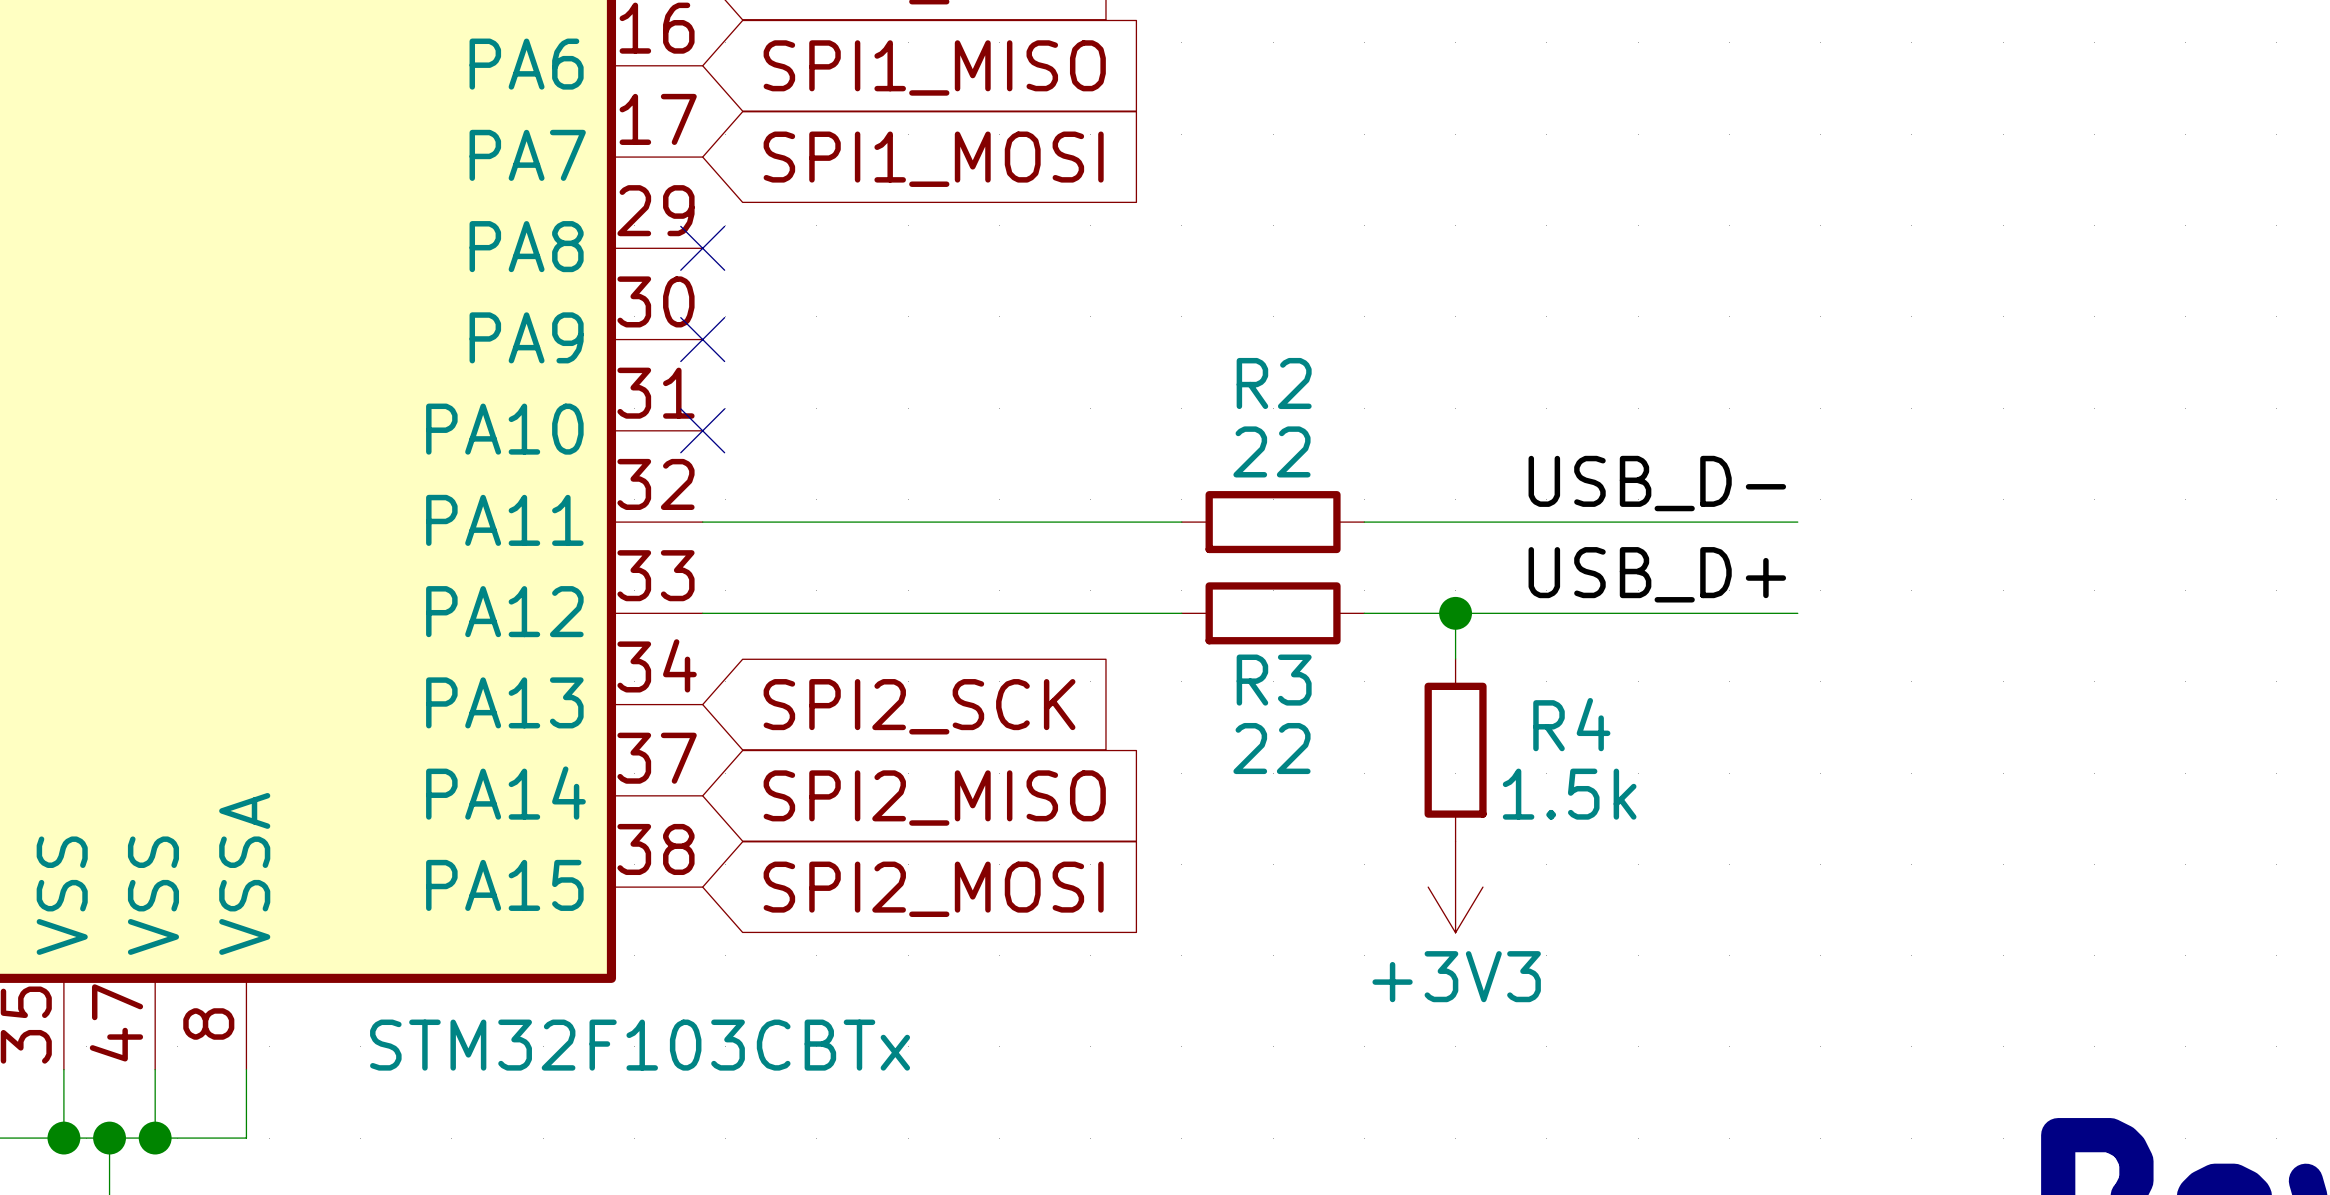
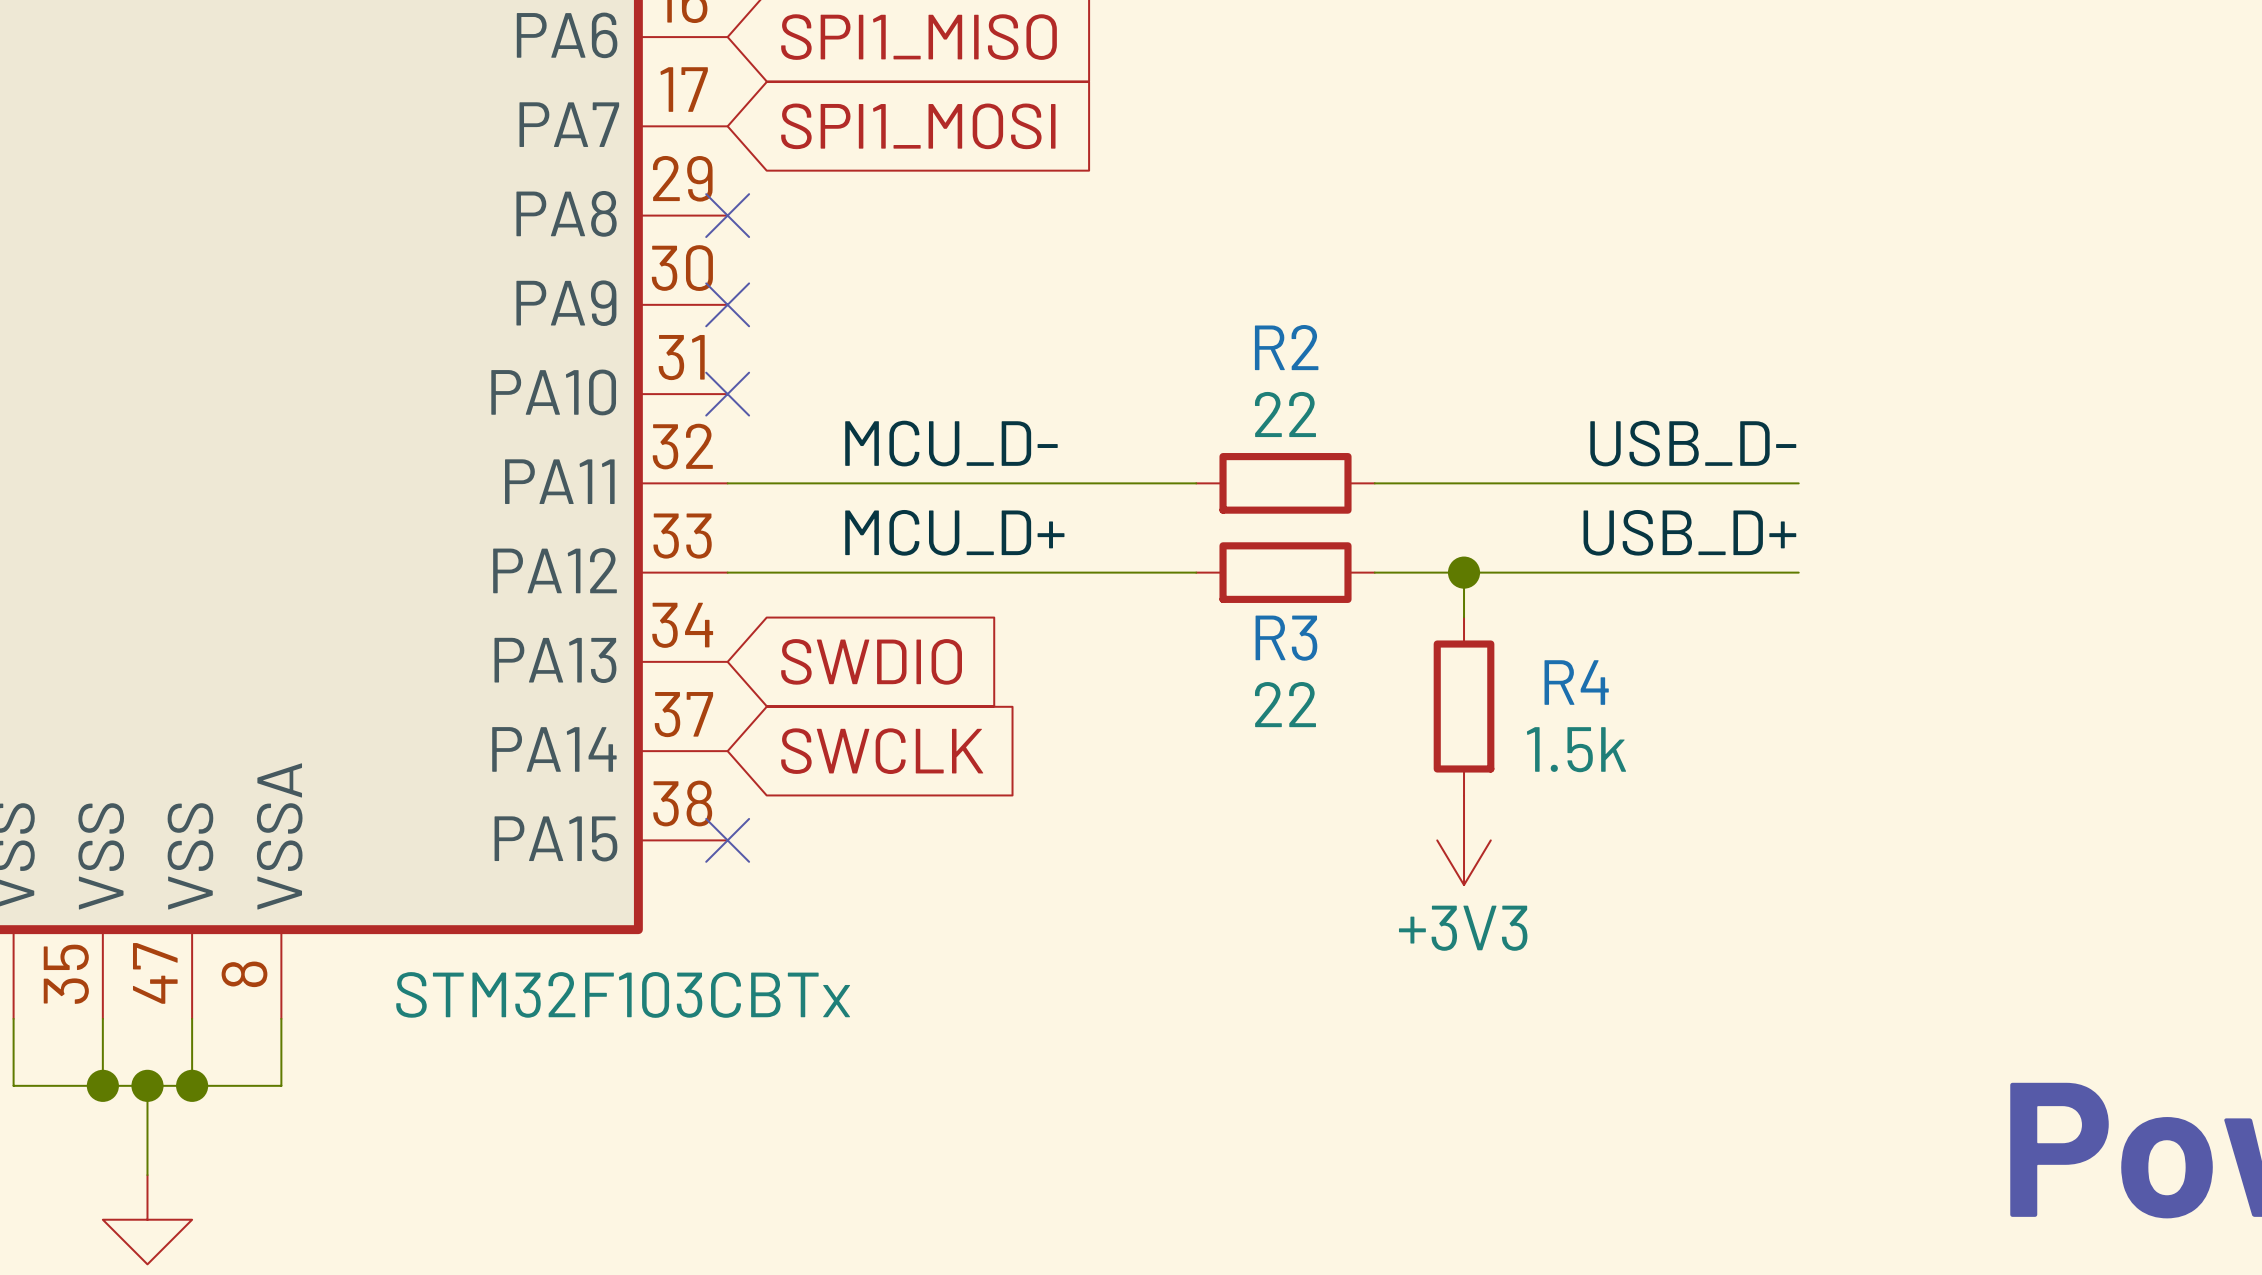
label: none -> MCU_D- (951, 443)
label: none -> MCU_D+ (954, 532)
global label: SPI2_SCK (919, 706) -> SWDIO (871, 661)
global label: SPI2_MISO (934, 798) -> SWCLK (882, 751)
no-connect mark: none -> (727, 840)
global label: SPI2_MOSI (933, 889) -> none

